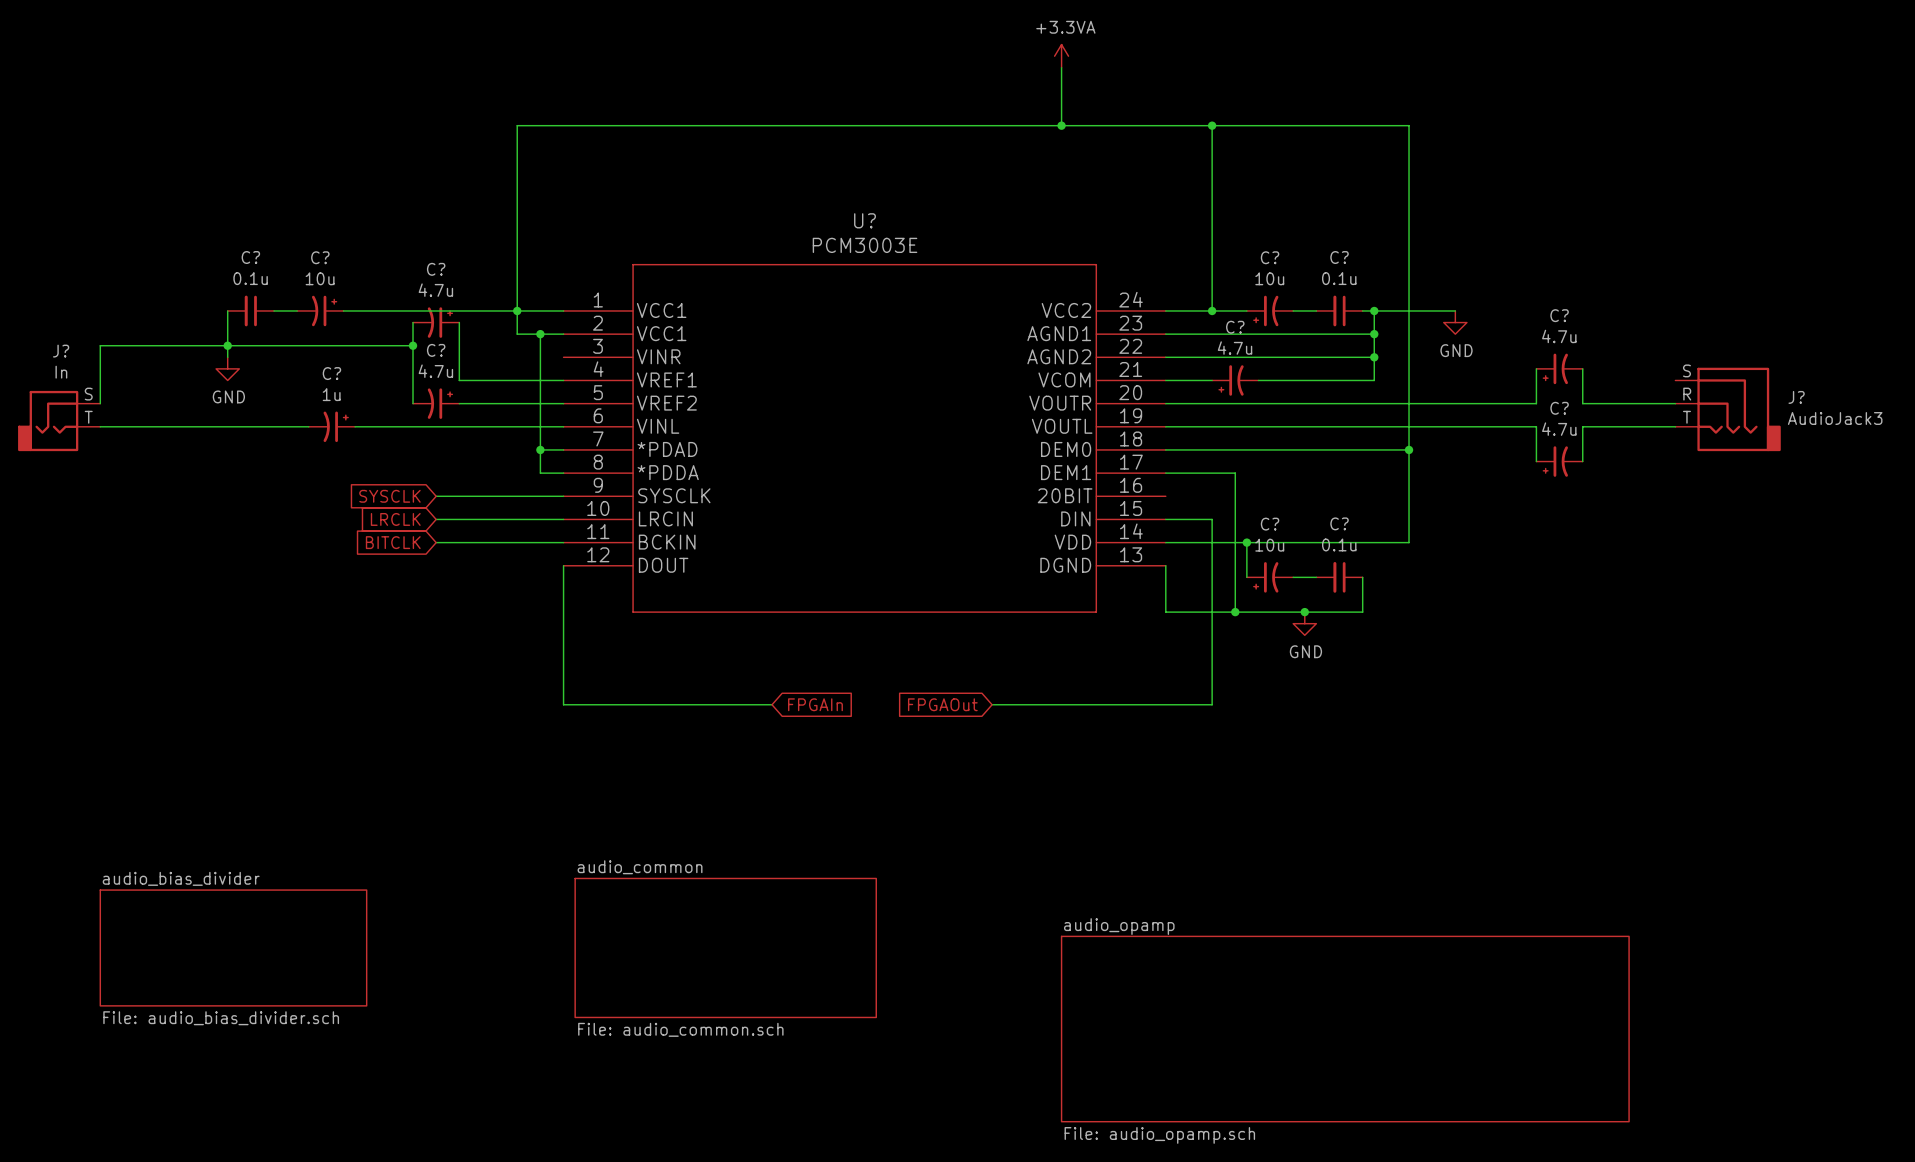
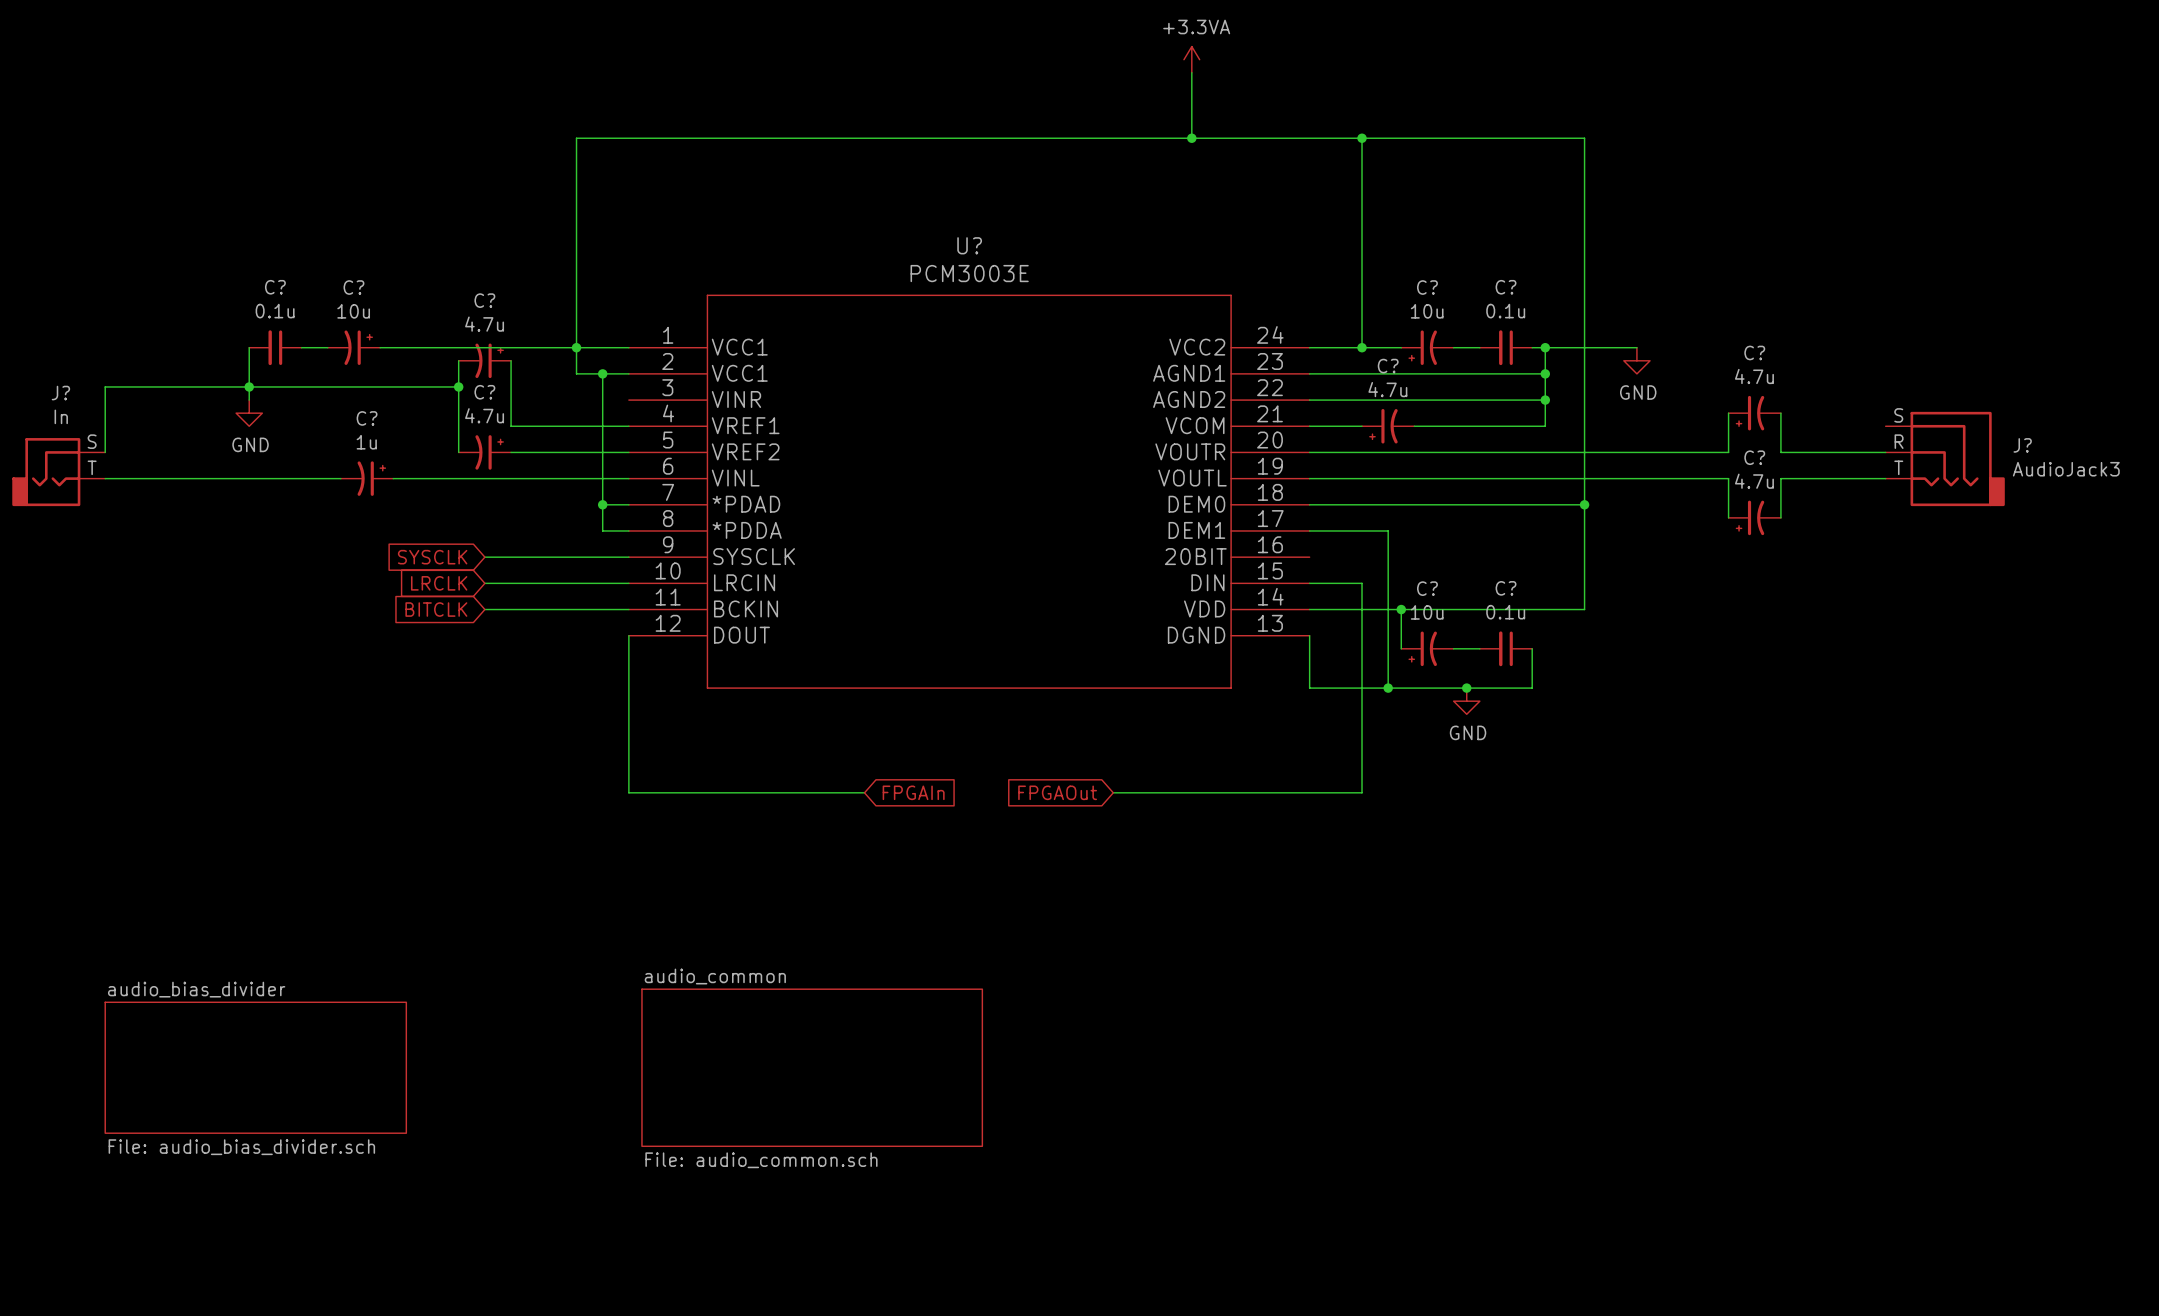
sheet audio_opamp: File: audio_opamp.sch (1345, 1029) -> none

